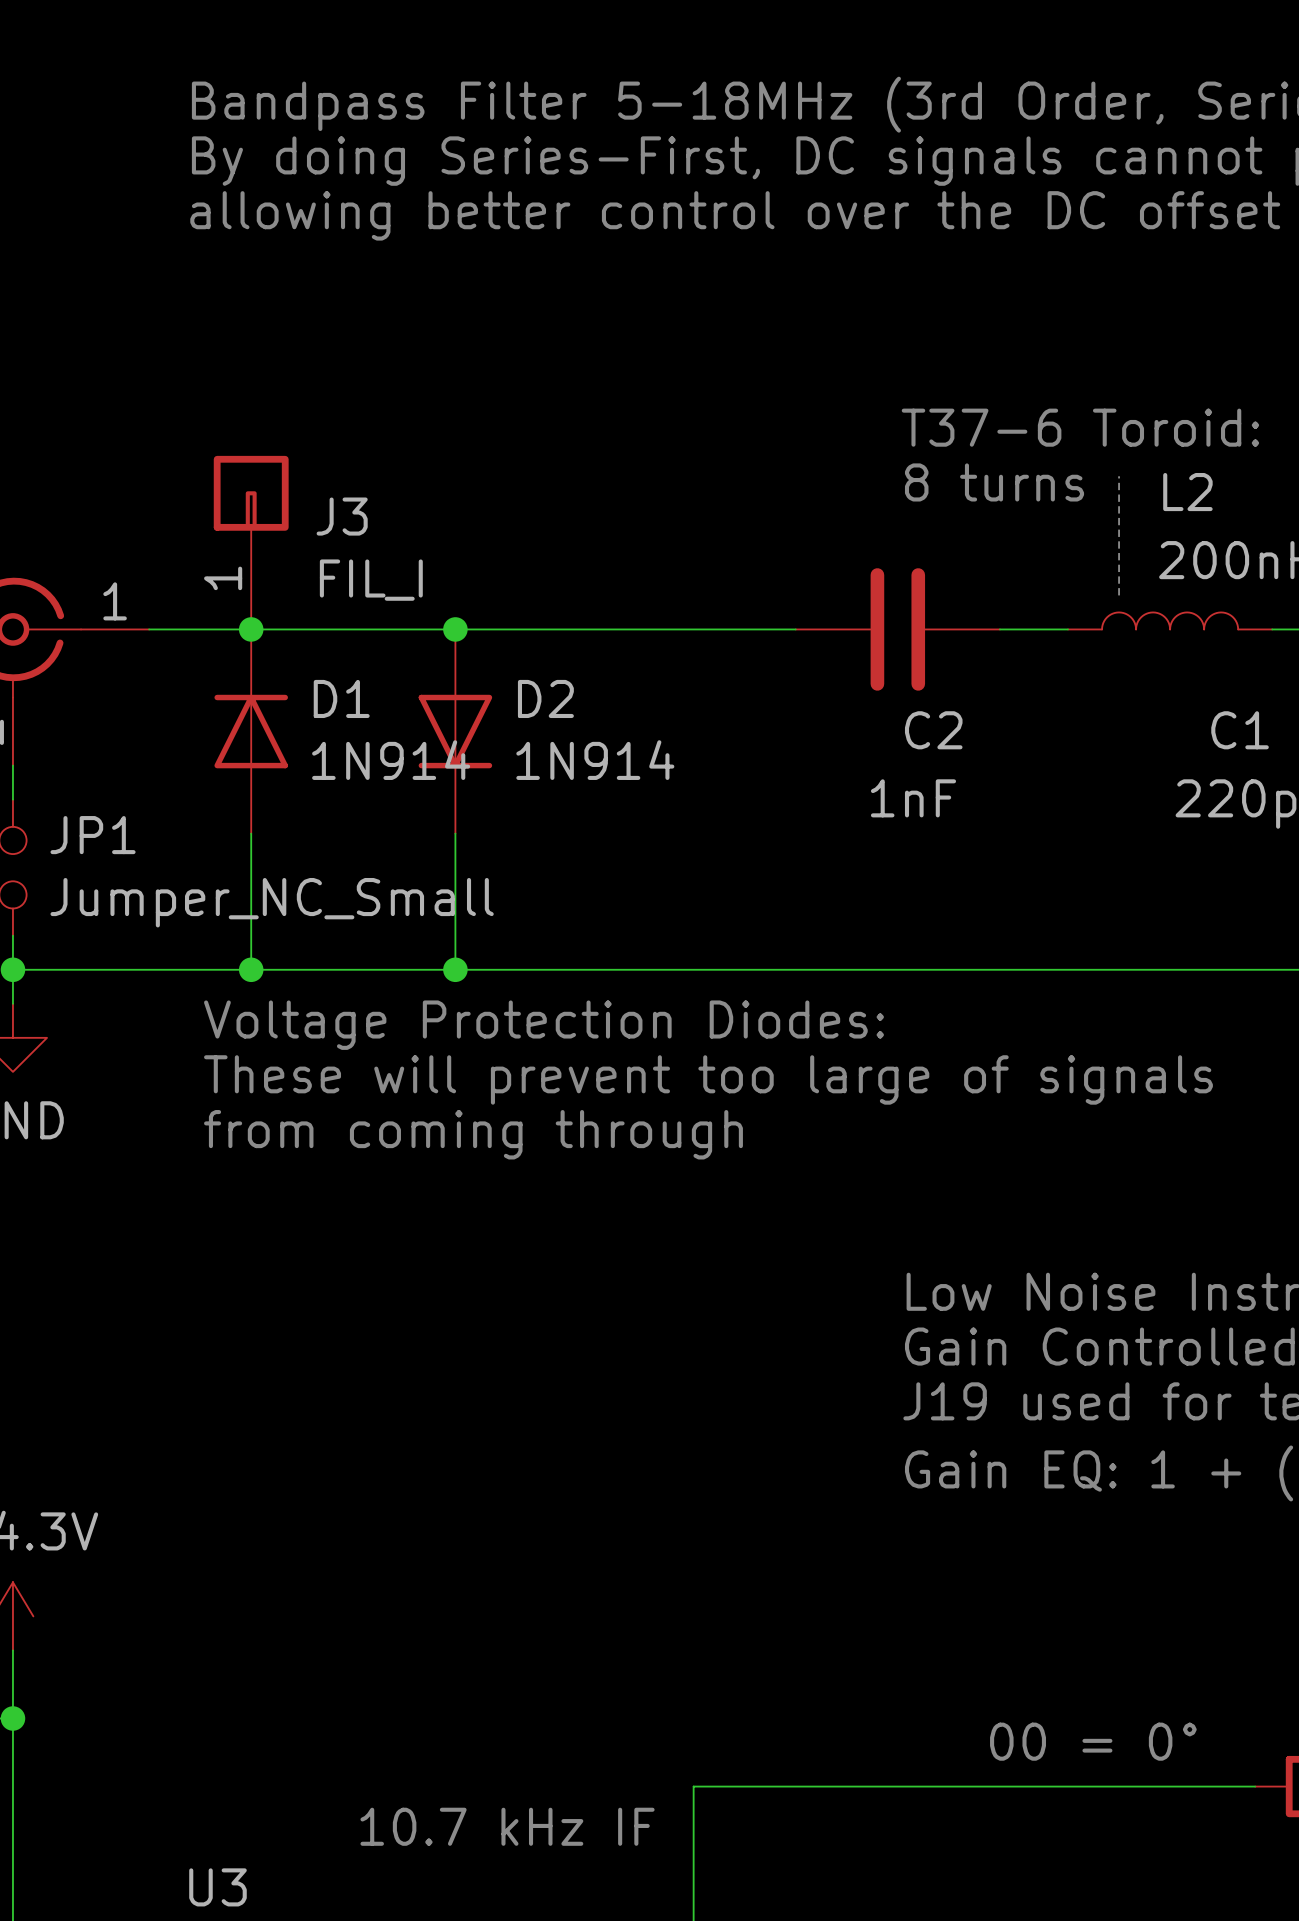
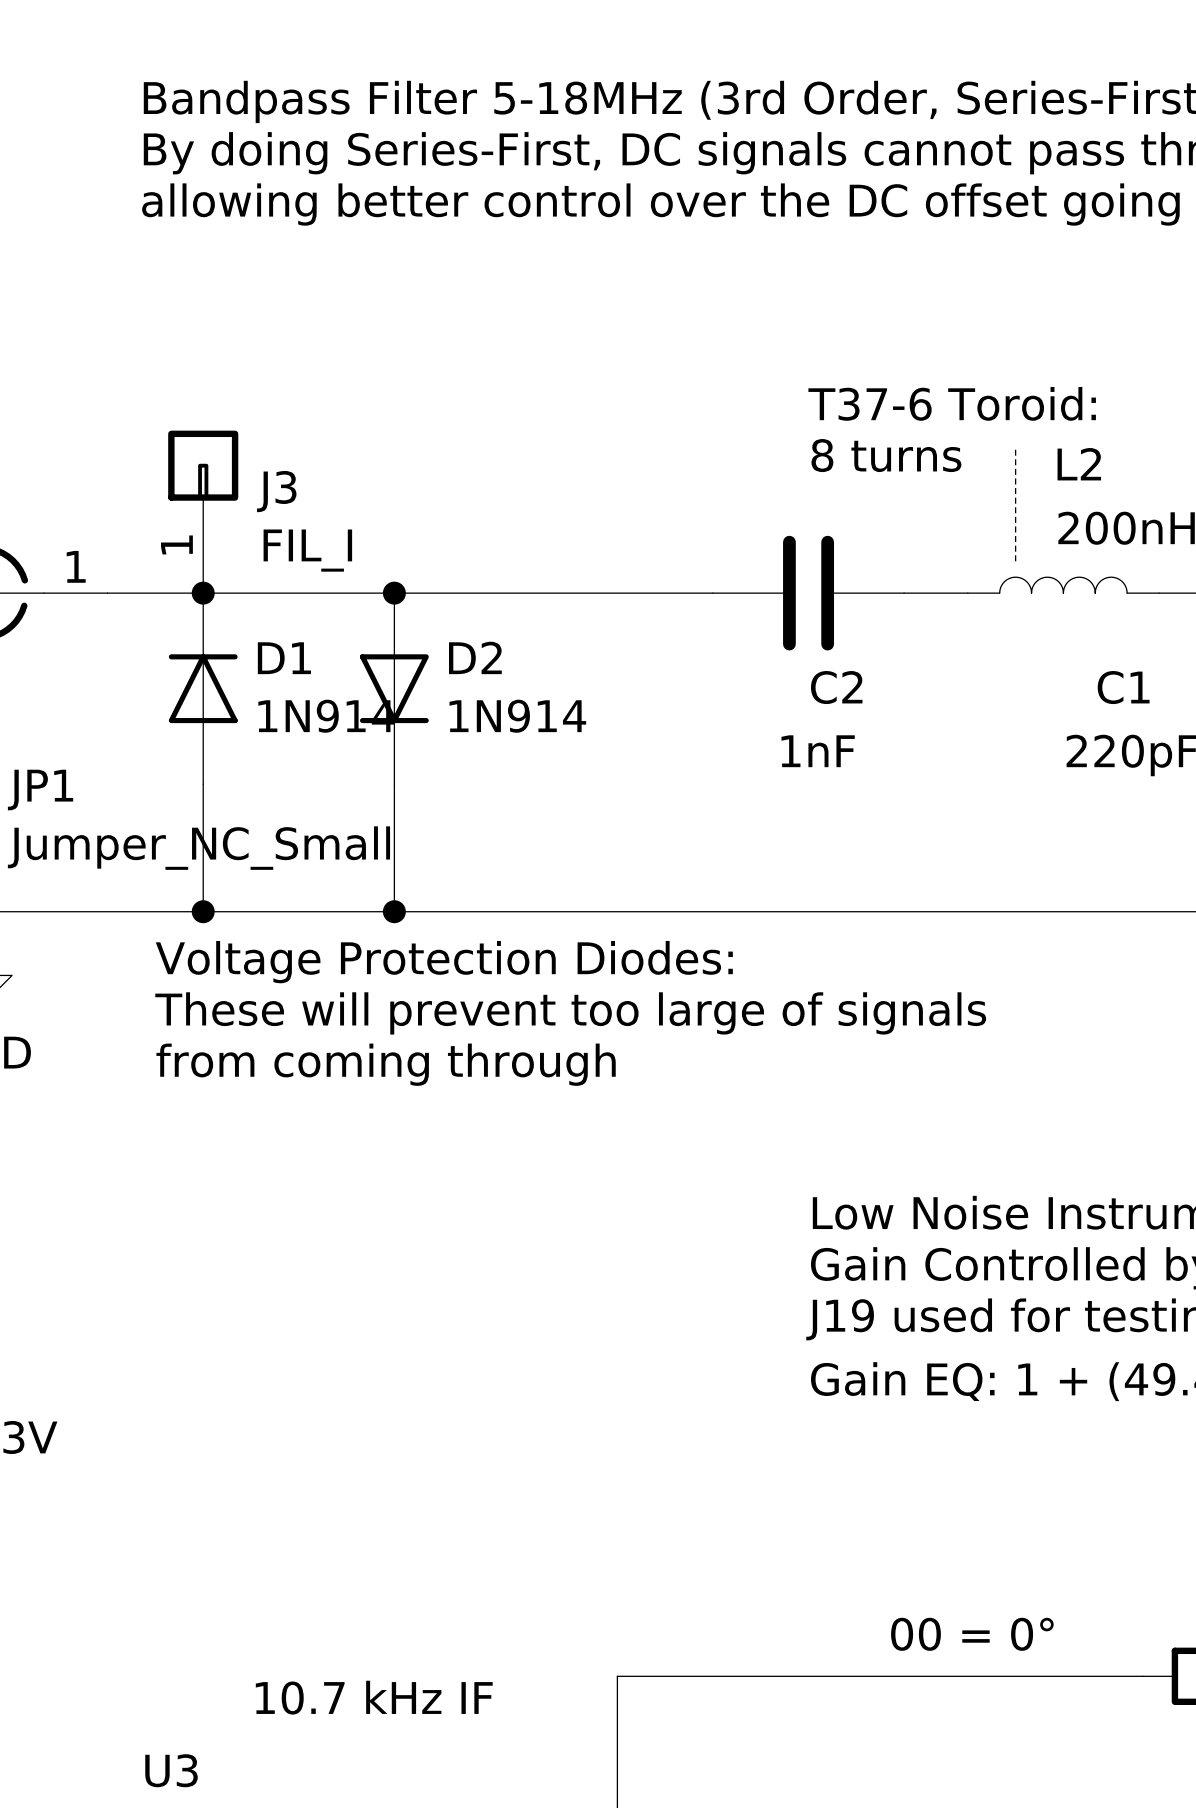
text position: 10.7 kHz IF (507, 1826) -> 10.7 kHz IF (374, 1697)

